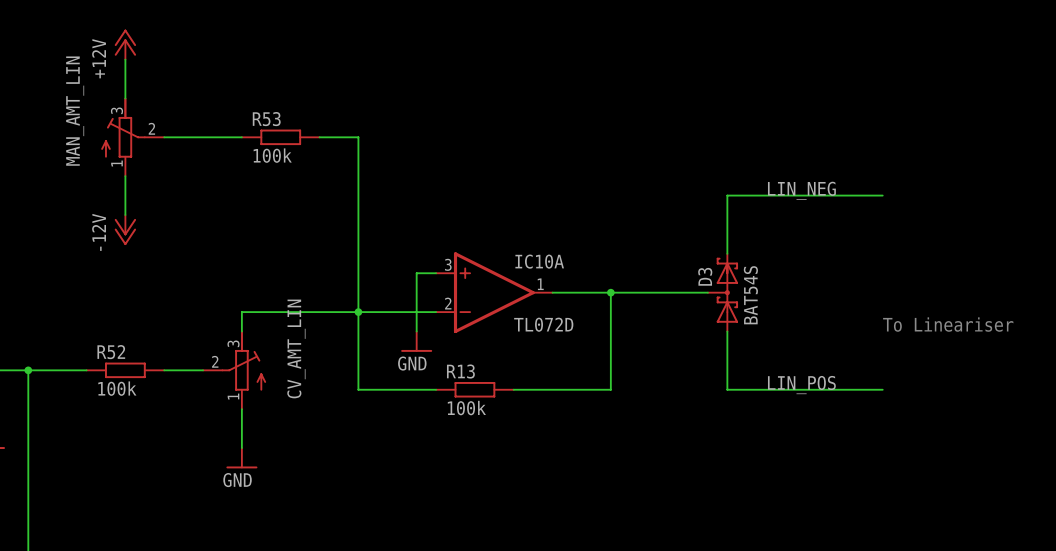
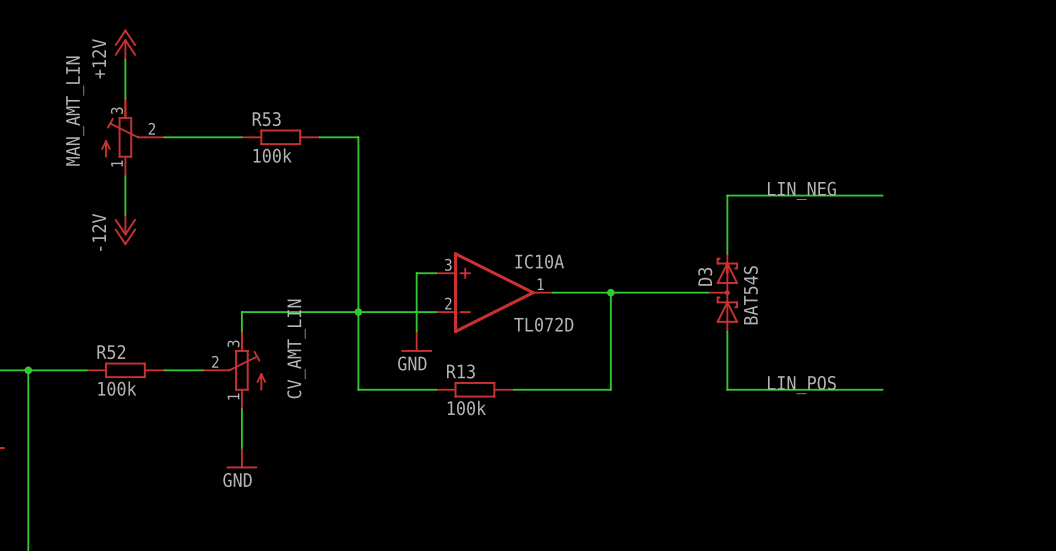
text: To Lineariser (948, 324) -> none

